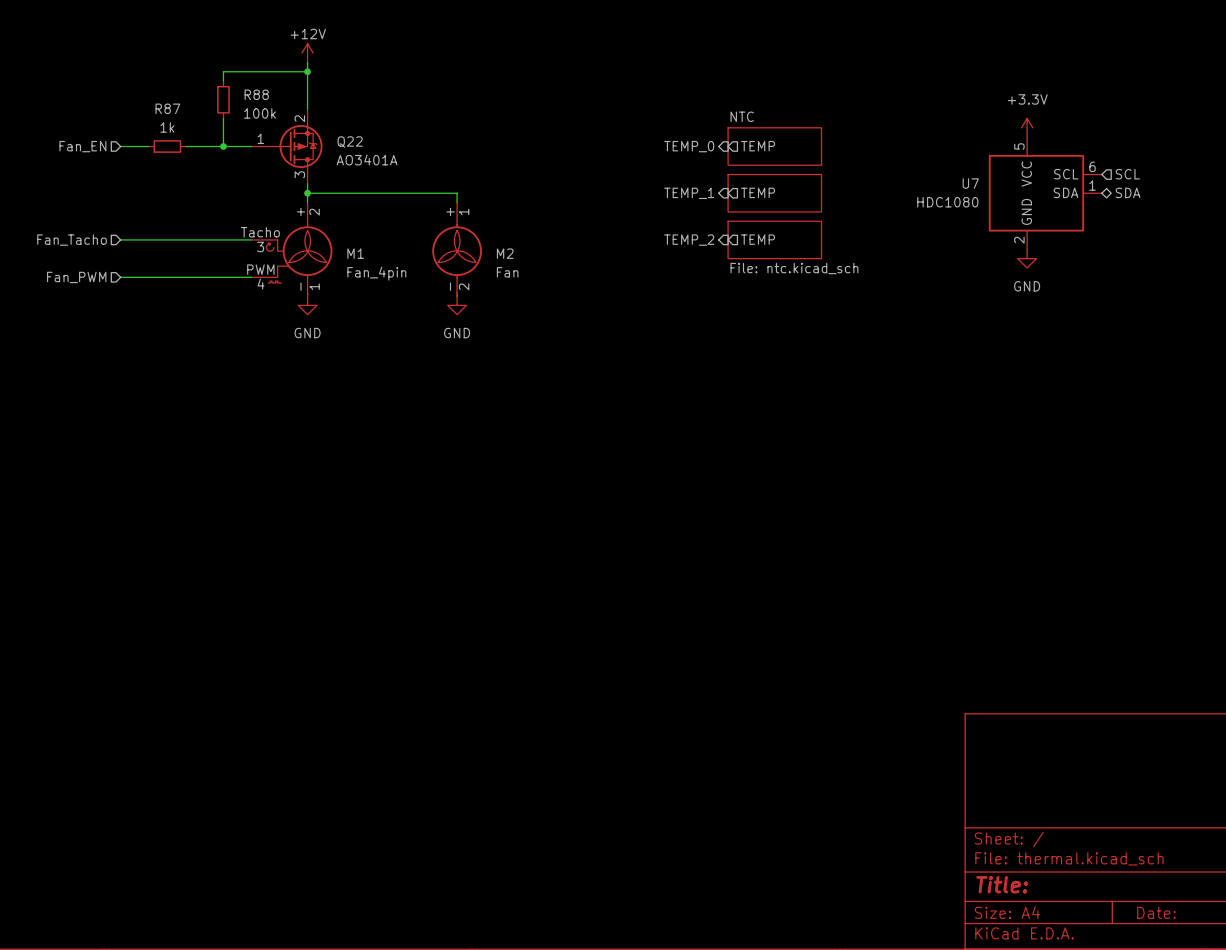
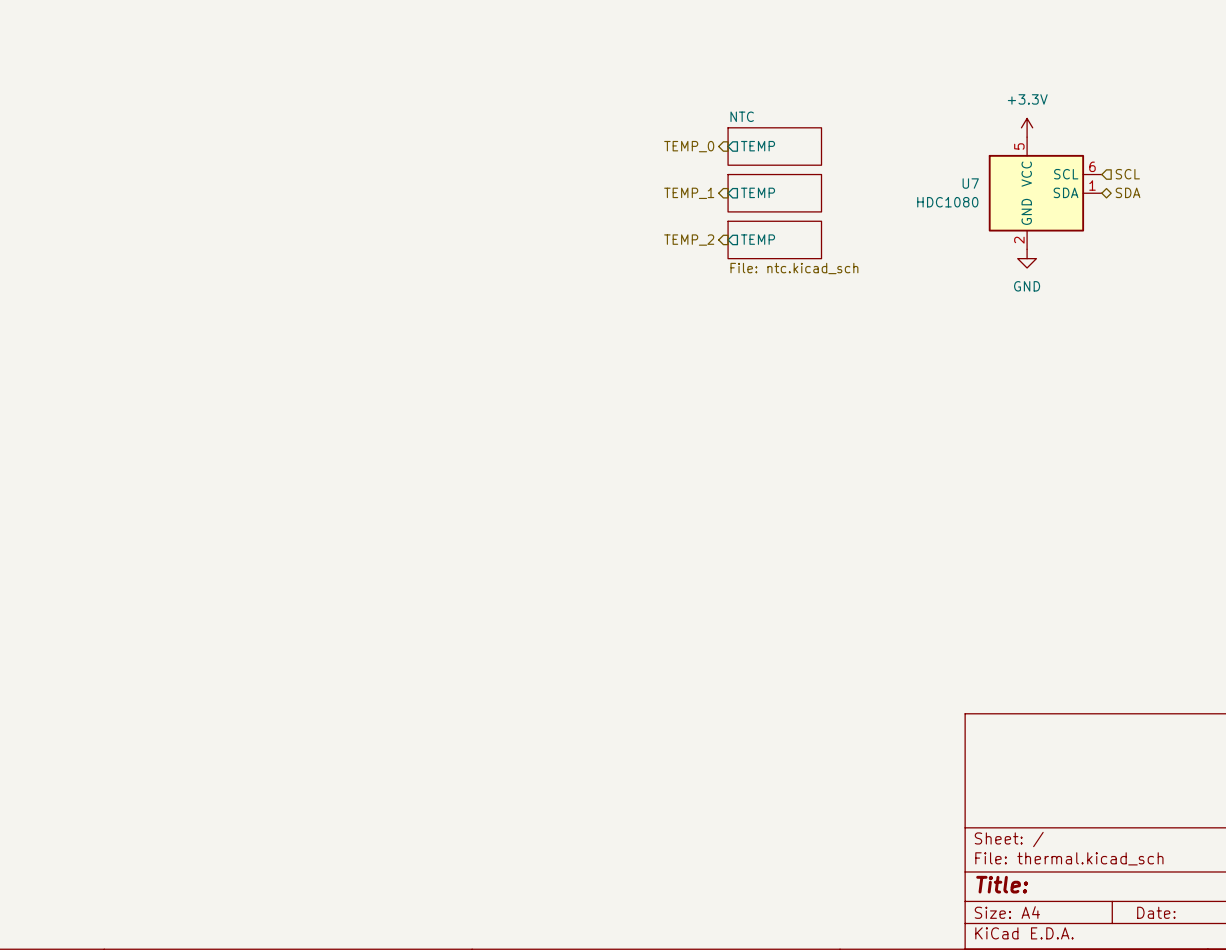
power symbol: +12V (307, 53) -> none
wire: (307, 62) (307, 109) -> none
wire: (307, 71) (223, 71) (223, 81) -> none
junction: (307, 71) -> none
R88: 100k (223, 99) -> none
wire: (223, 118) (223, 146) -> none
hierarchical label: Fan_EN (82, 146) -> none
wire: (120, 146) (148, 146) -> none
R87: 1k (167, 146) -> none
wire: (186, 146) (251, 146) -> none
junction: (223, 146) -> none
Q22: AO3401A (287, 146) -> none
wire: (307, 183) (307, 202) -> none
wire: (307, 193) (457, 193) (457, 202) -> none
junction: (307, 193) -> none
wire: (120, 239) (251, 239) -> none
hierarchical label: Fan_Tacho (72, 240) -> none
M1: Fan_4pin (291, 249) -> none
M2: Fan (457, 249) -> none
hierarchical label: Fan_PWM (76, 277) -> none
wire: (120, 277) (251, 277) -> none
power symbol: GND (307, 305) -> none
power symbol: GND (457, 305) -> none

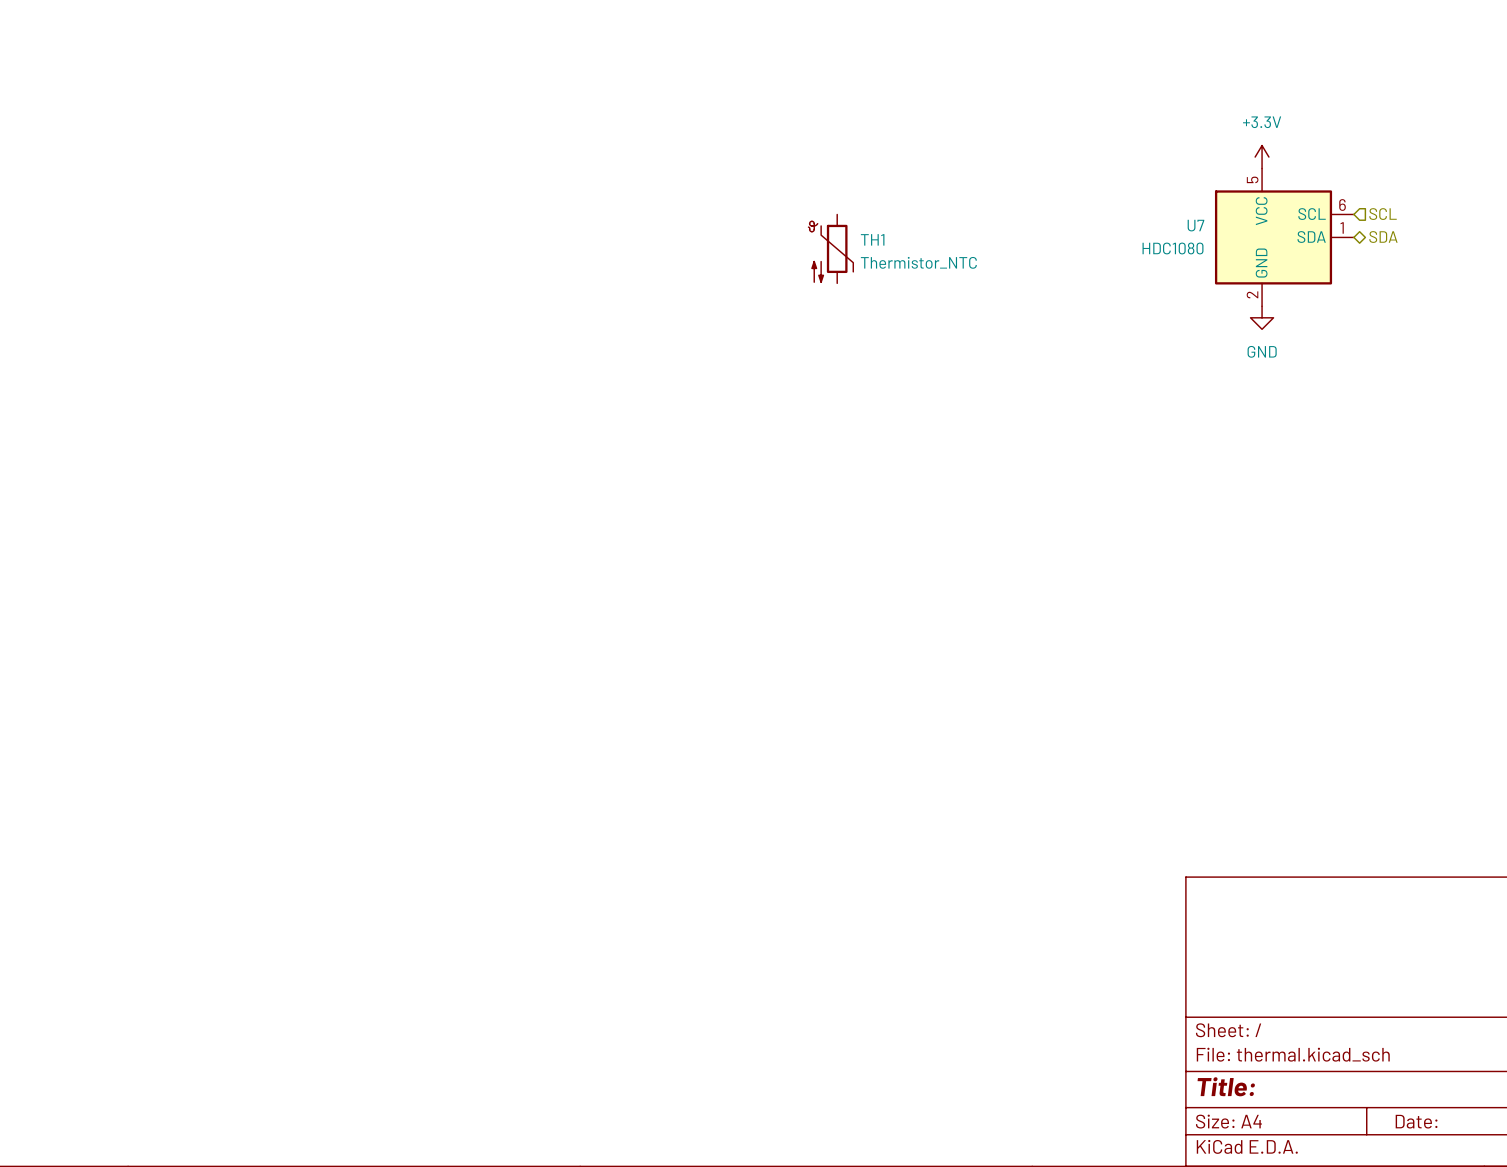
hierarchical label: TEMP_0 (689, 146) -> none
sheet pin: TEMP (758, 146) -> none
sheet NTC: (774, 146) -> none
sheet pin: TEMP (758, 192) -> none
hierarchical label: TEMP_1 (689, 193) -> none
sheet: (774, 193) -> none
TH1: none -> Thermistor_NTC (830, 248)
sheet pin: TEMP (758, 239) -> none
sheet: File: ntc.kicad_sch (774, 239) -> none
hierarchical label: TEMP_2 (689, 240) -> none

